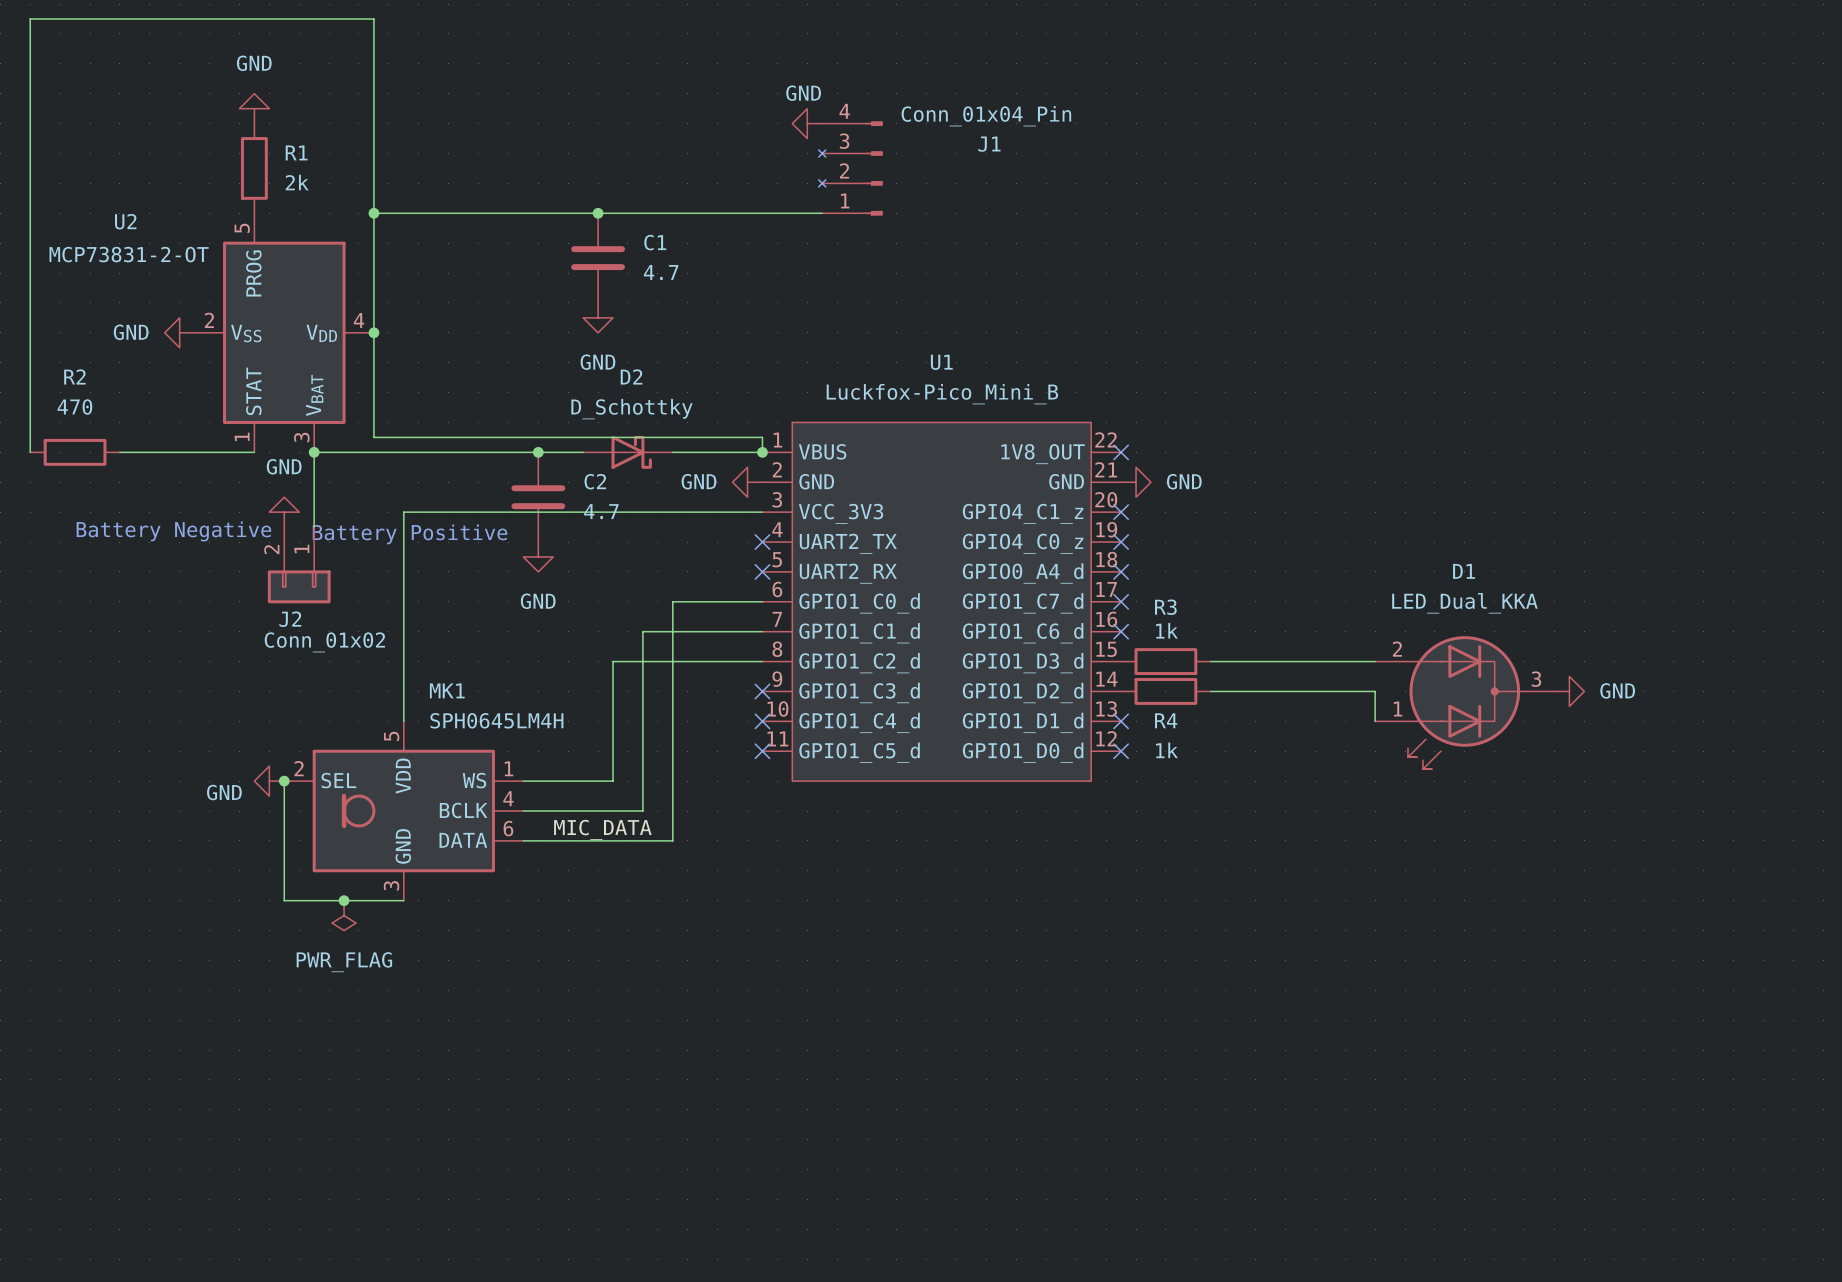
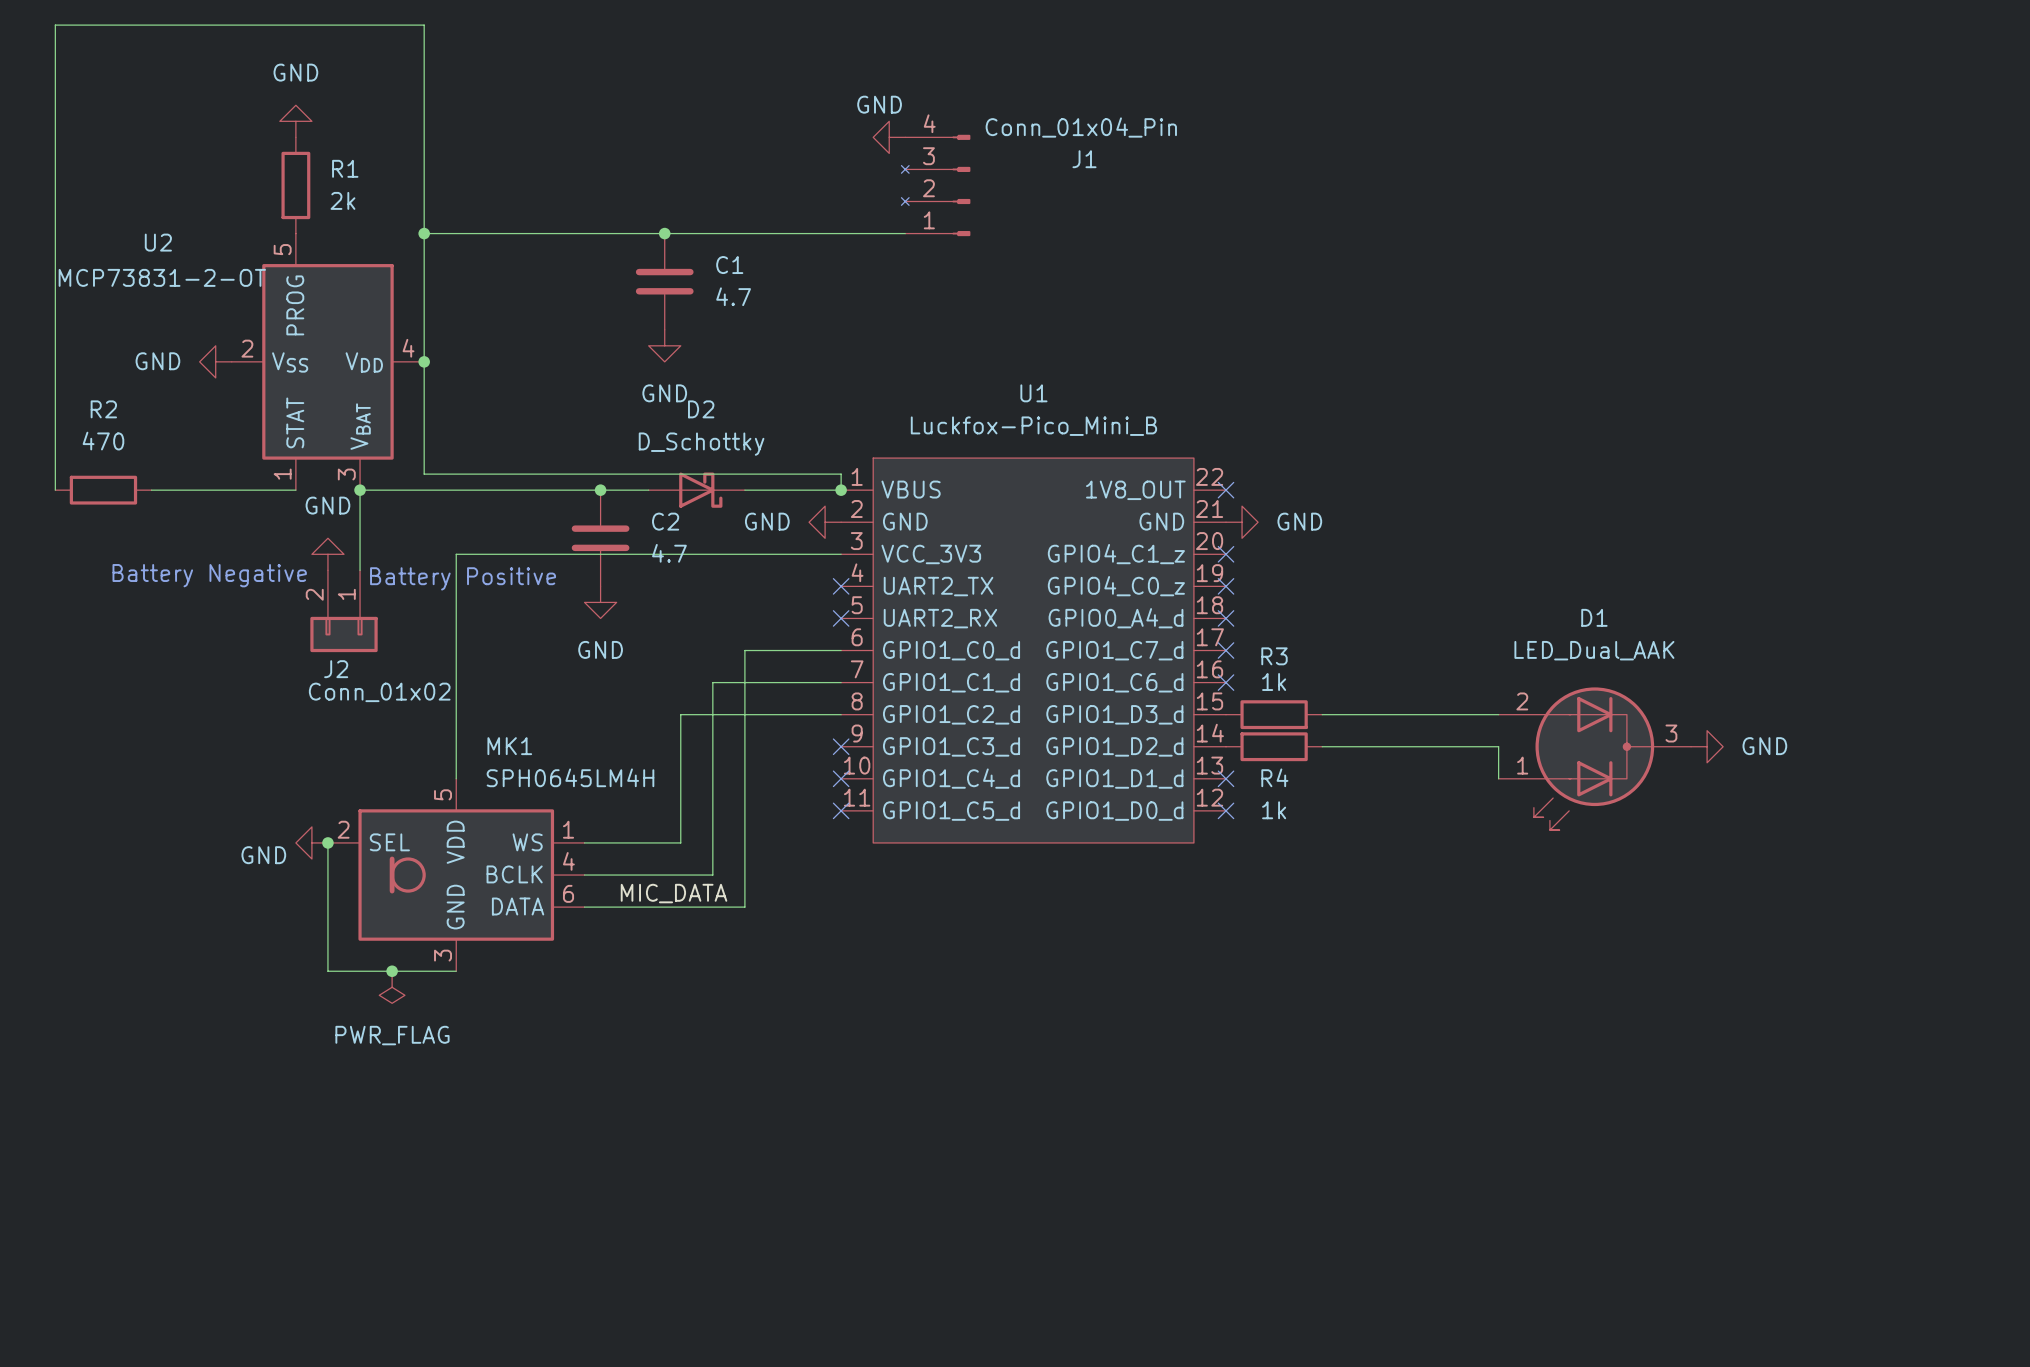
D1 value: LED_Dual_KKA (1464, 603) -> LED_Dual_AAK (1594, 650)

